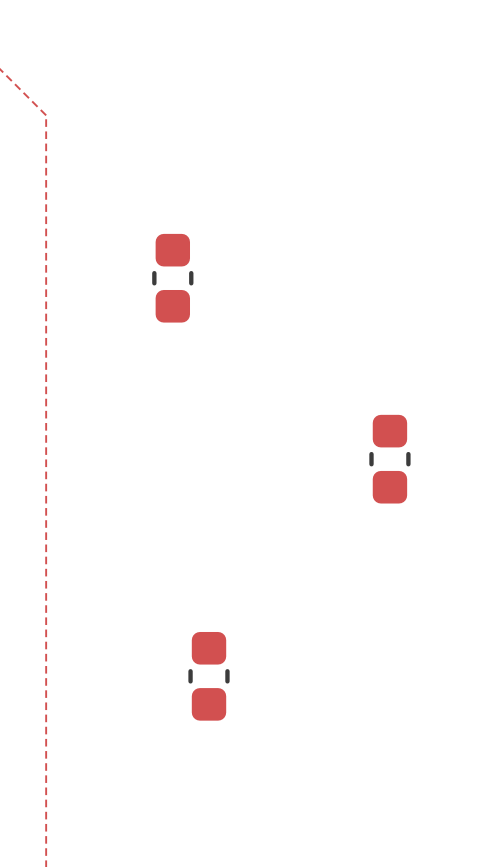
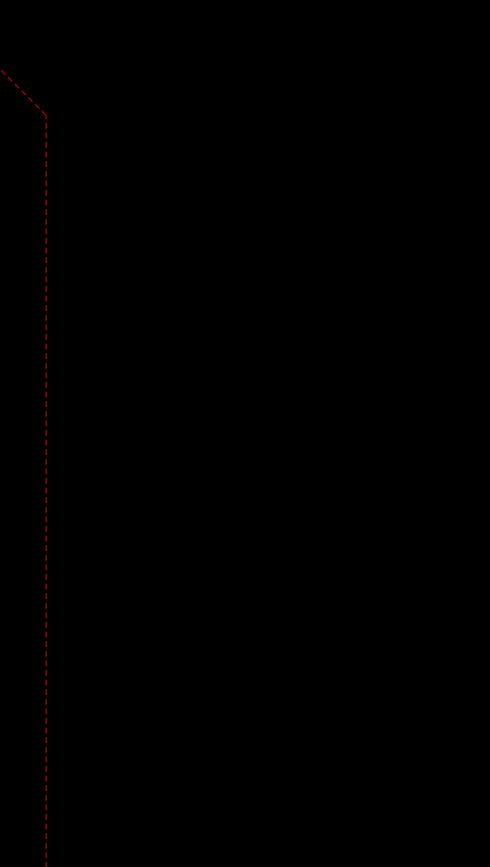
part: (172, 278) -> none
part: (389, 459) -> none
part: (209, 676) -> none

